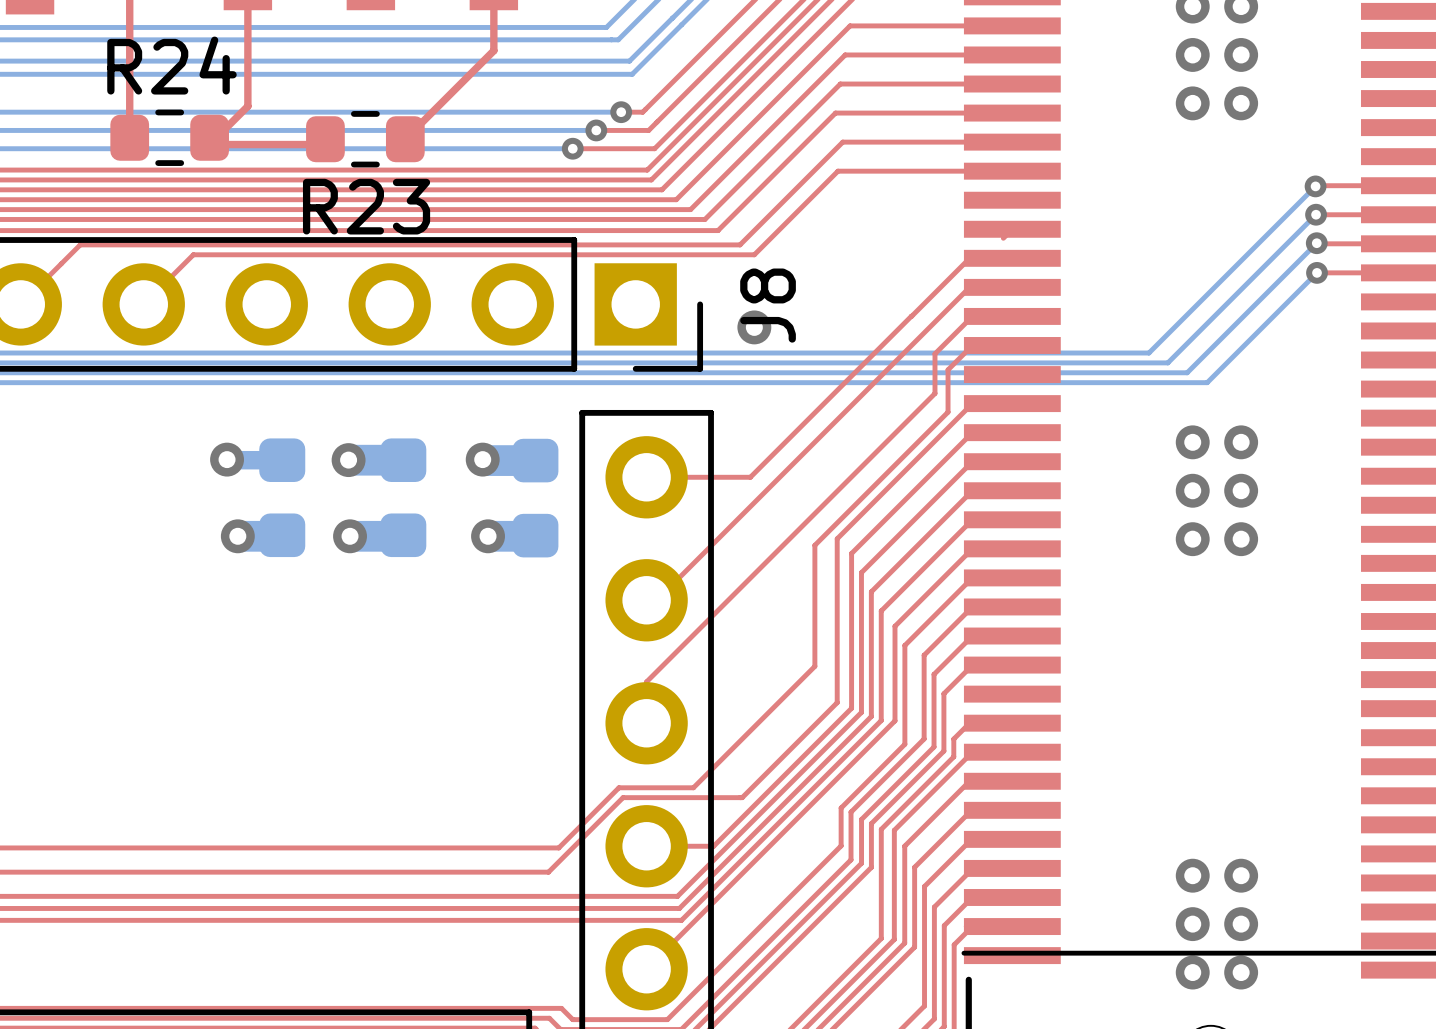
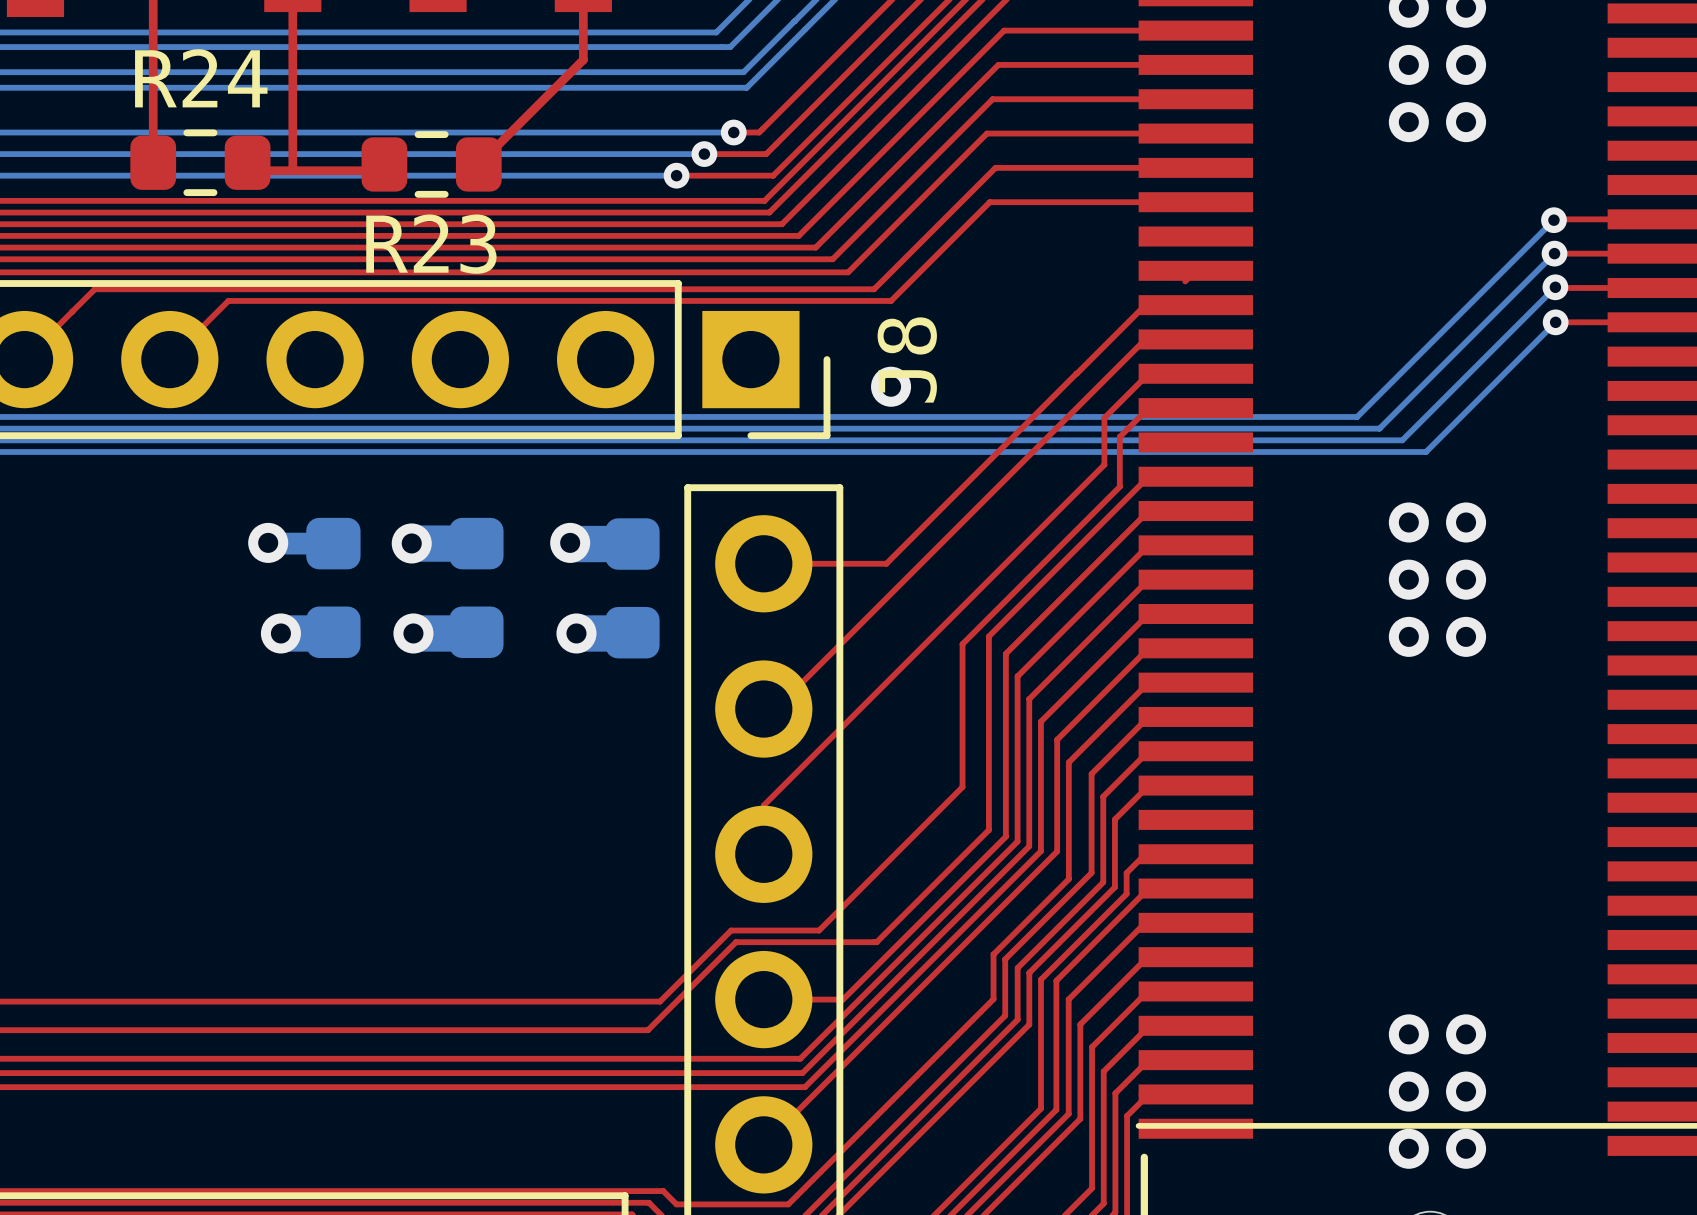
top track: (247, 106) (209, 144) -> (292, 125) (292, 168) (290, 170)

